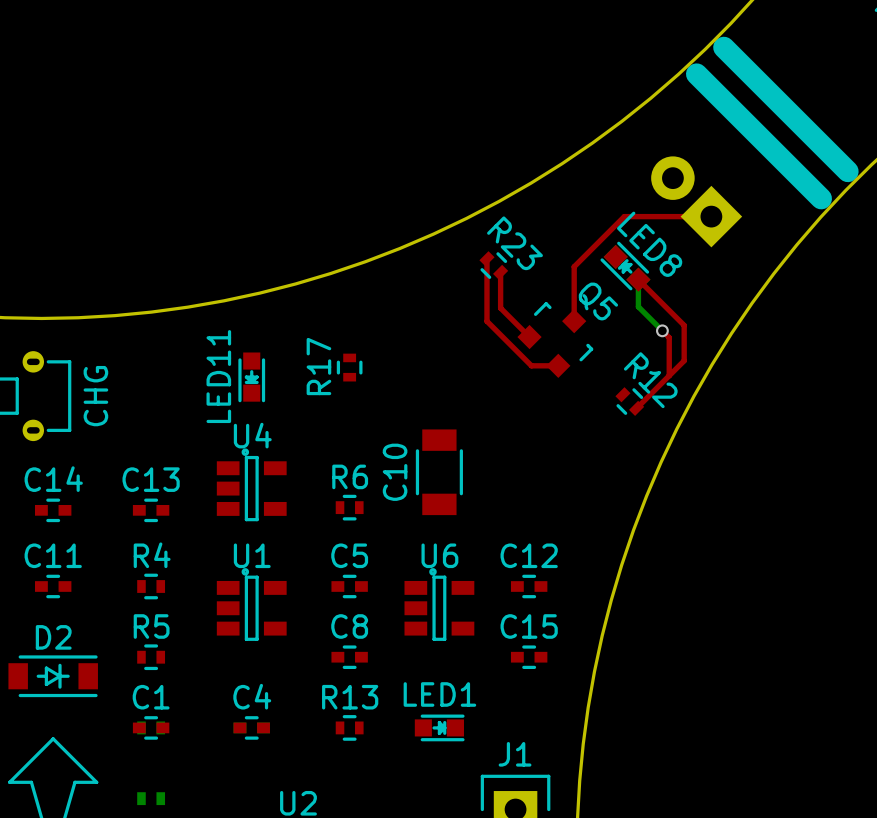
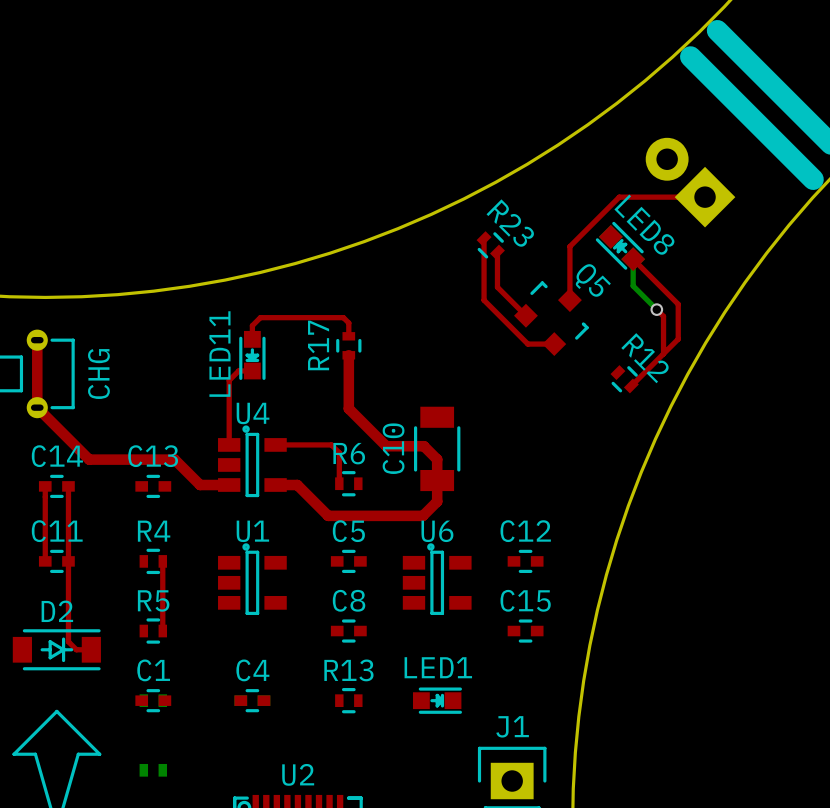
top track: none -> (348, 336) (348, 323) (343, 317) (260, 317) (252, 325) (252, 339)
top track: none -> (37, 340) (37, 407) (89, 459) (174, 459) (200, 485) (229, 485)
top track: none -> (348, 355) (348, 408) (386, 446) (423, 446) (437, 459) (437, 501) (422, 515) (328, 515) (297, 485) (275, 485)
top track: none -> (252, 370) (238, 370) (229, 380) (229, 444)
top track: none -> (275, 444) (331, 444) (339, 452) (339, 483)
top track: none -> (45, 486) (45, 561)
top track: none -> (68, 486) (68, 641) (76, 649) (91, 649)
top track: none -> (162, 561) (162, 631)

